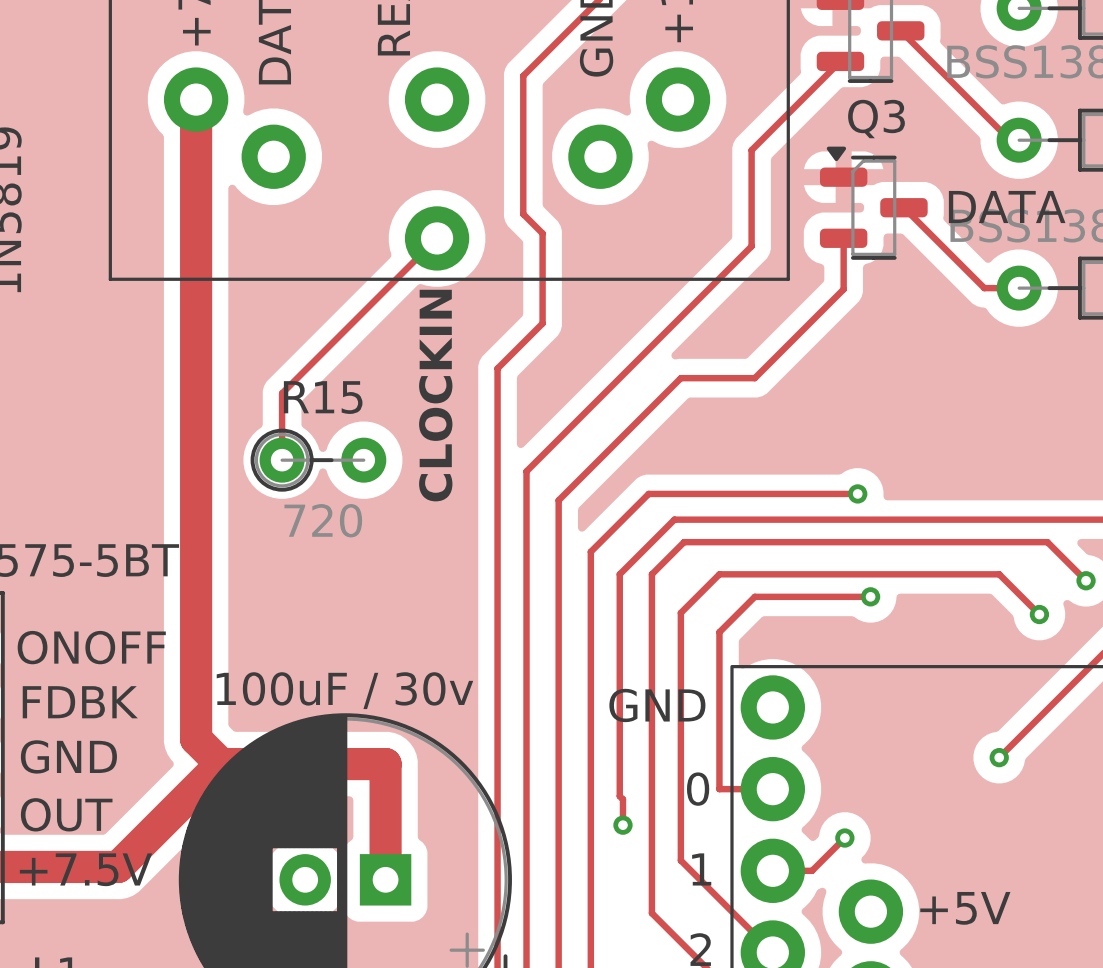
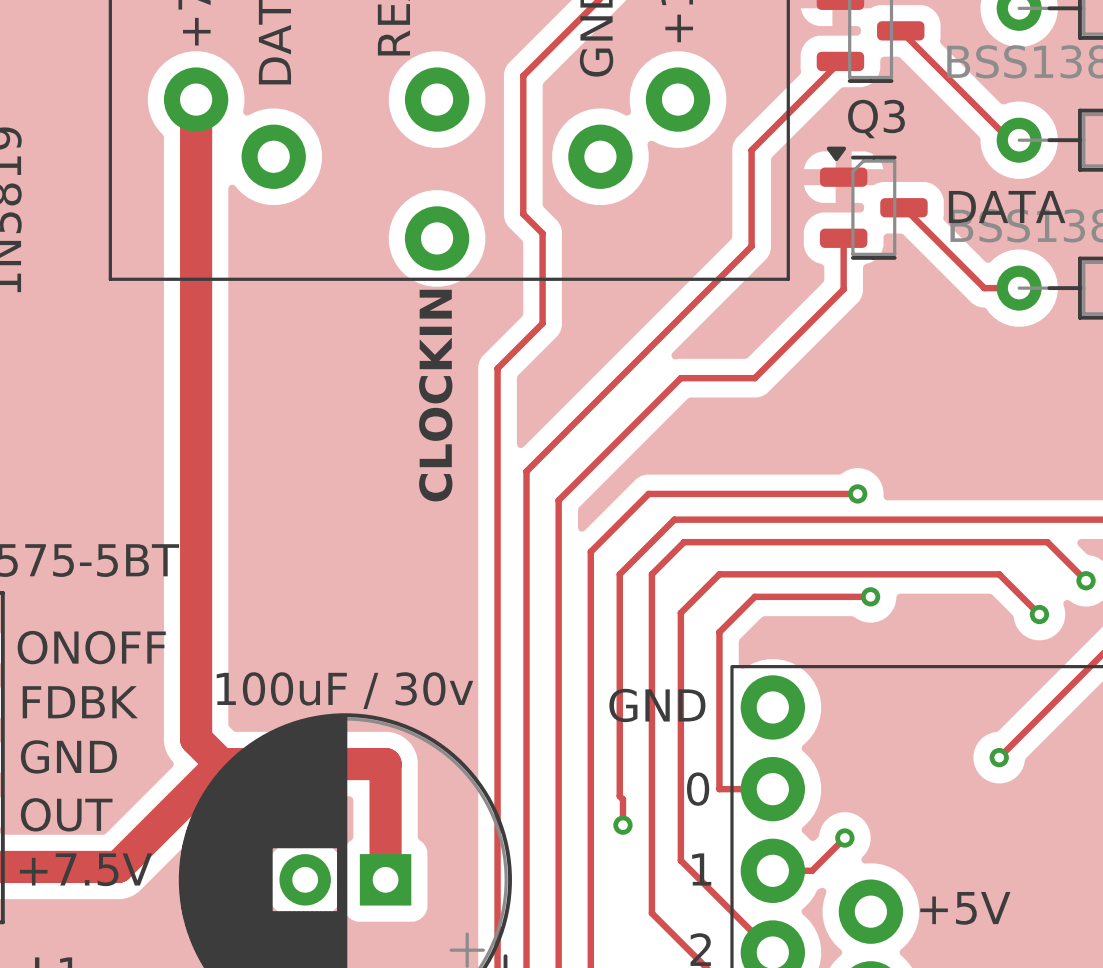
track: (437, 238) (282, 393) (282, 460) -> none
R15: 720 (318, 460) -> none

